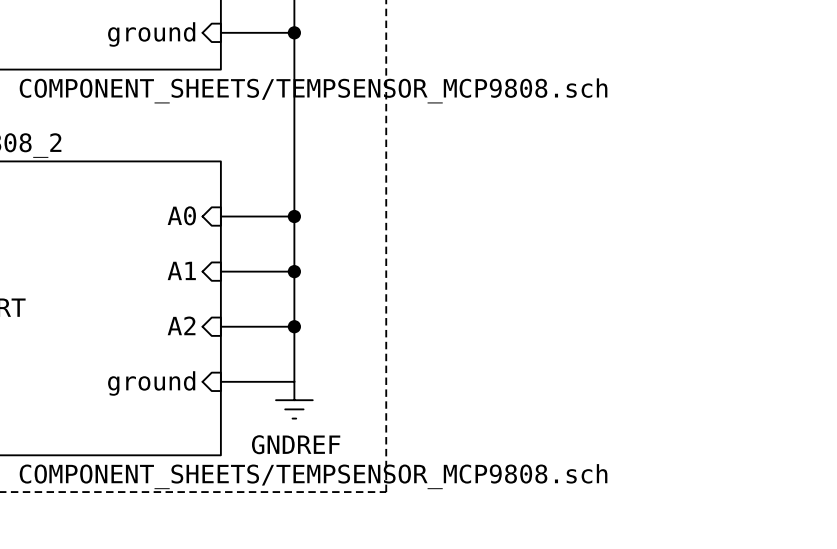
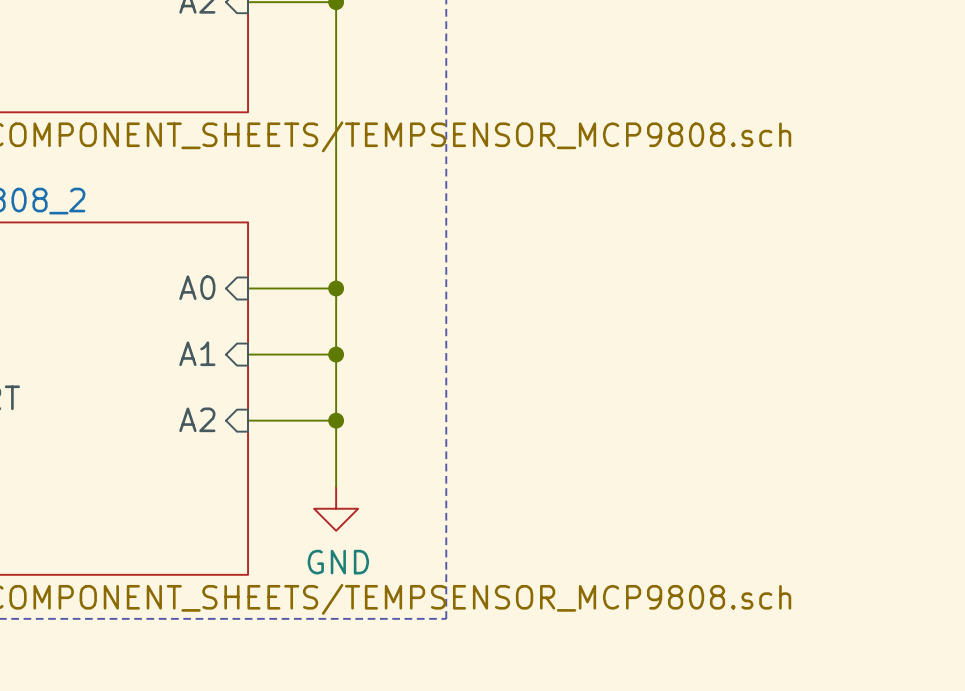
wire: (220, 32) (294, 32) -> none
junction: (294, 32) -> none
sheet pin: ground (151, 34) -> none
wire: (220, 381) (294, 381) -> none
sheet pin: ground (151, 383) -> none
power symbol: GNDREF (294, 400) -> GND (336, 508)

